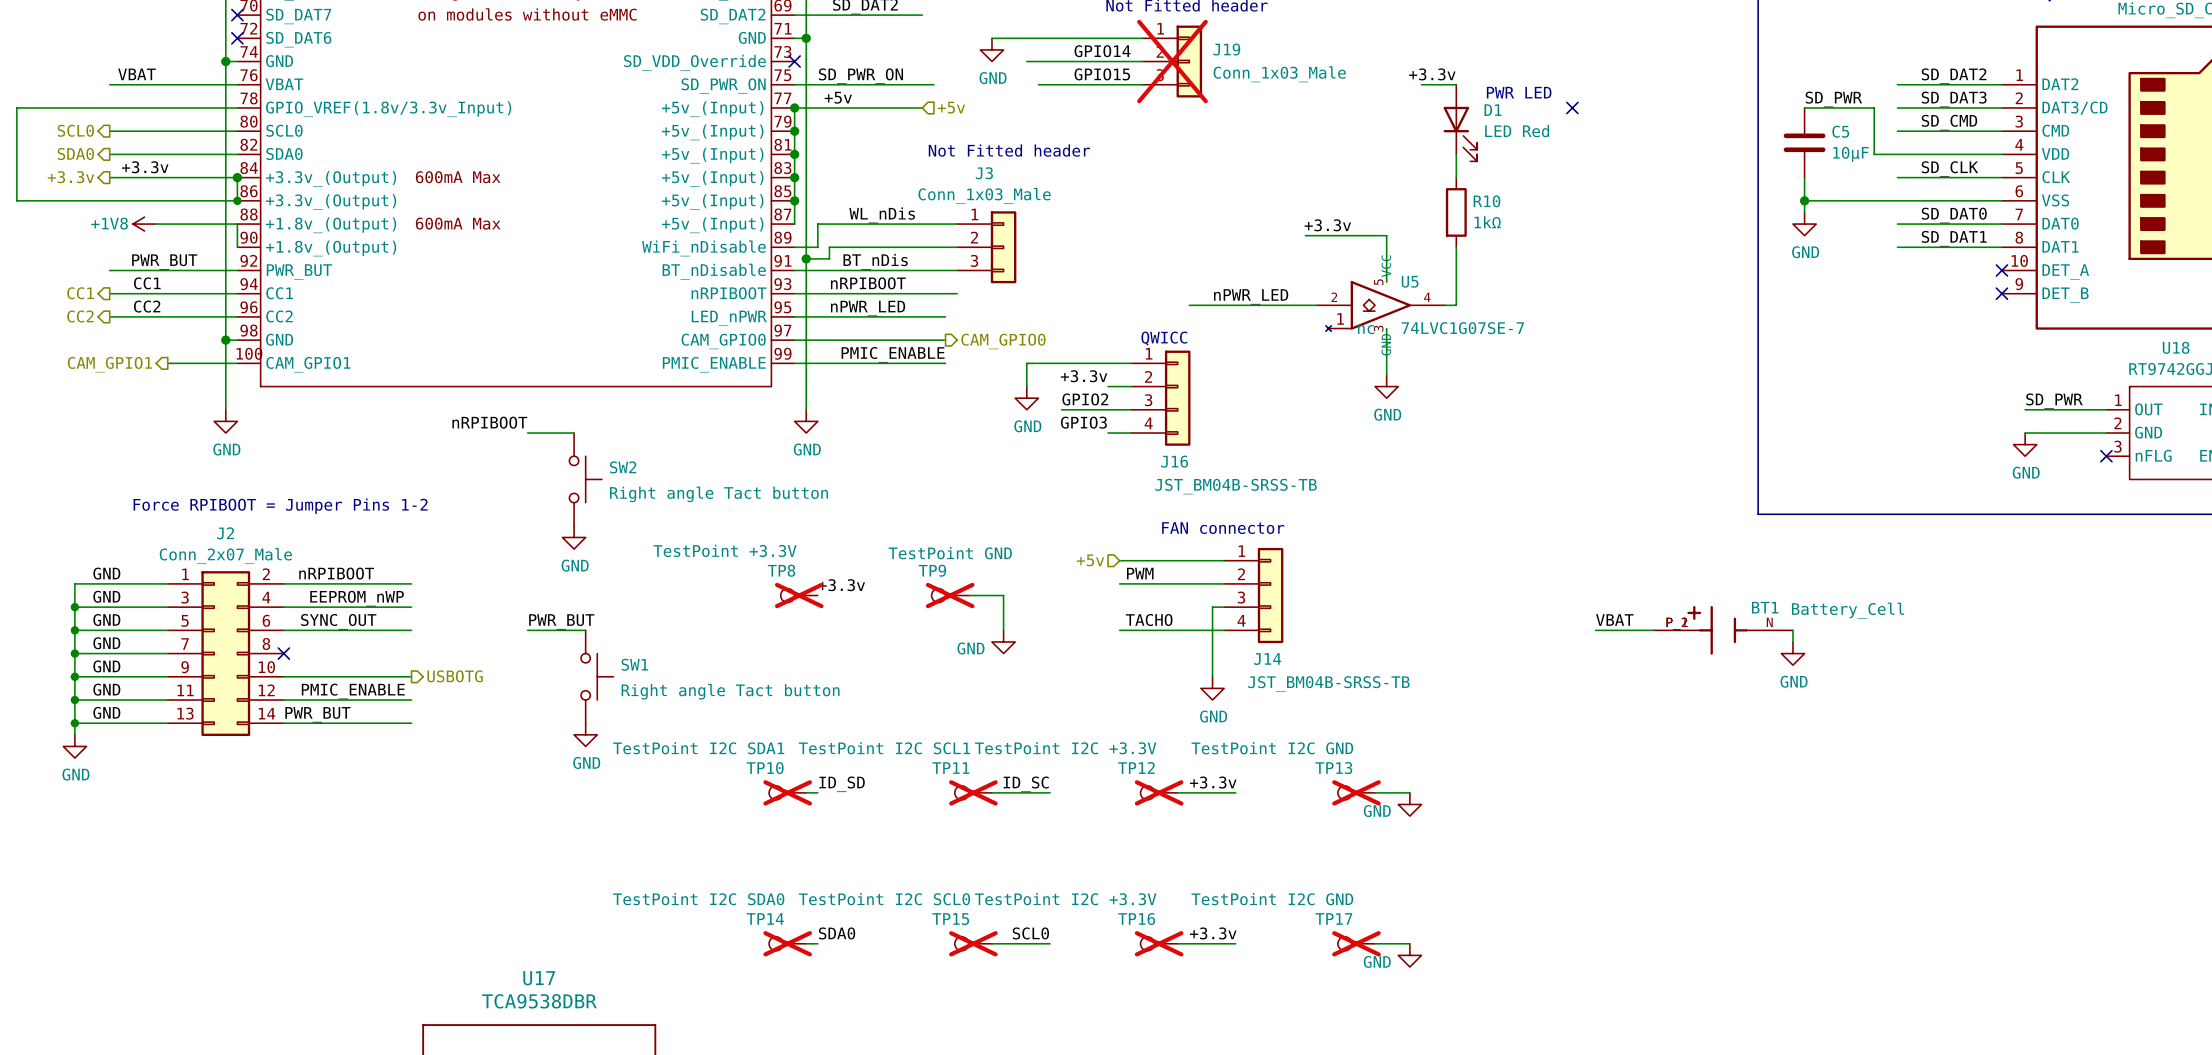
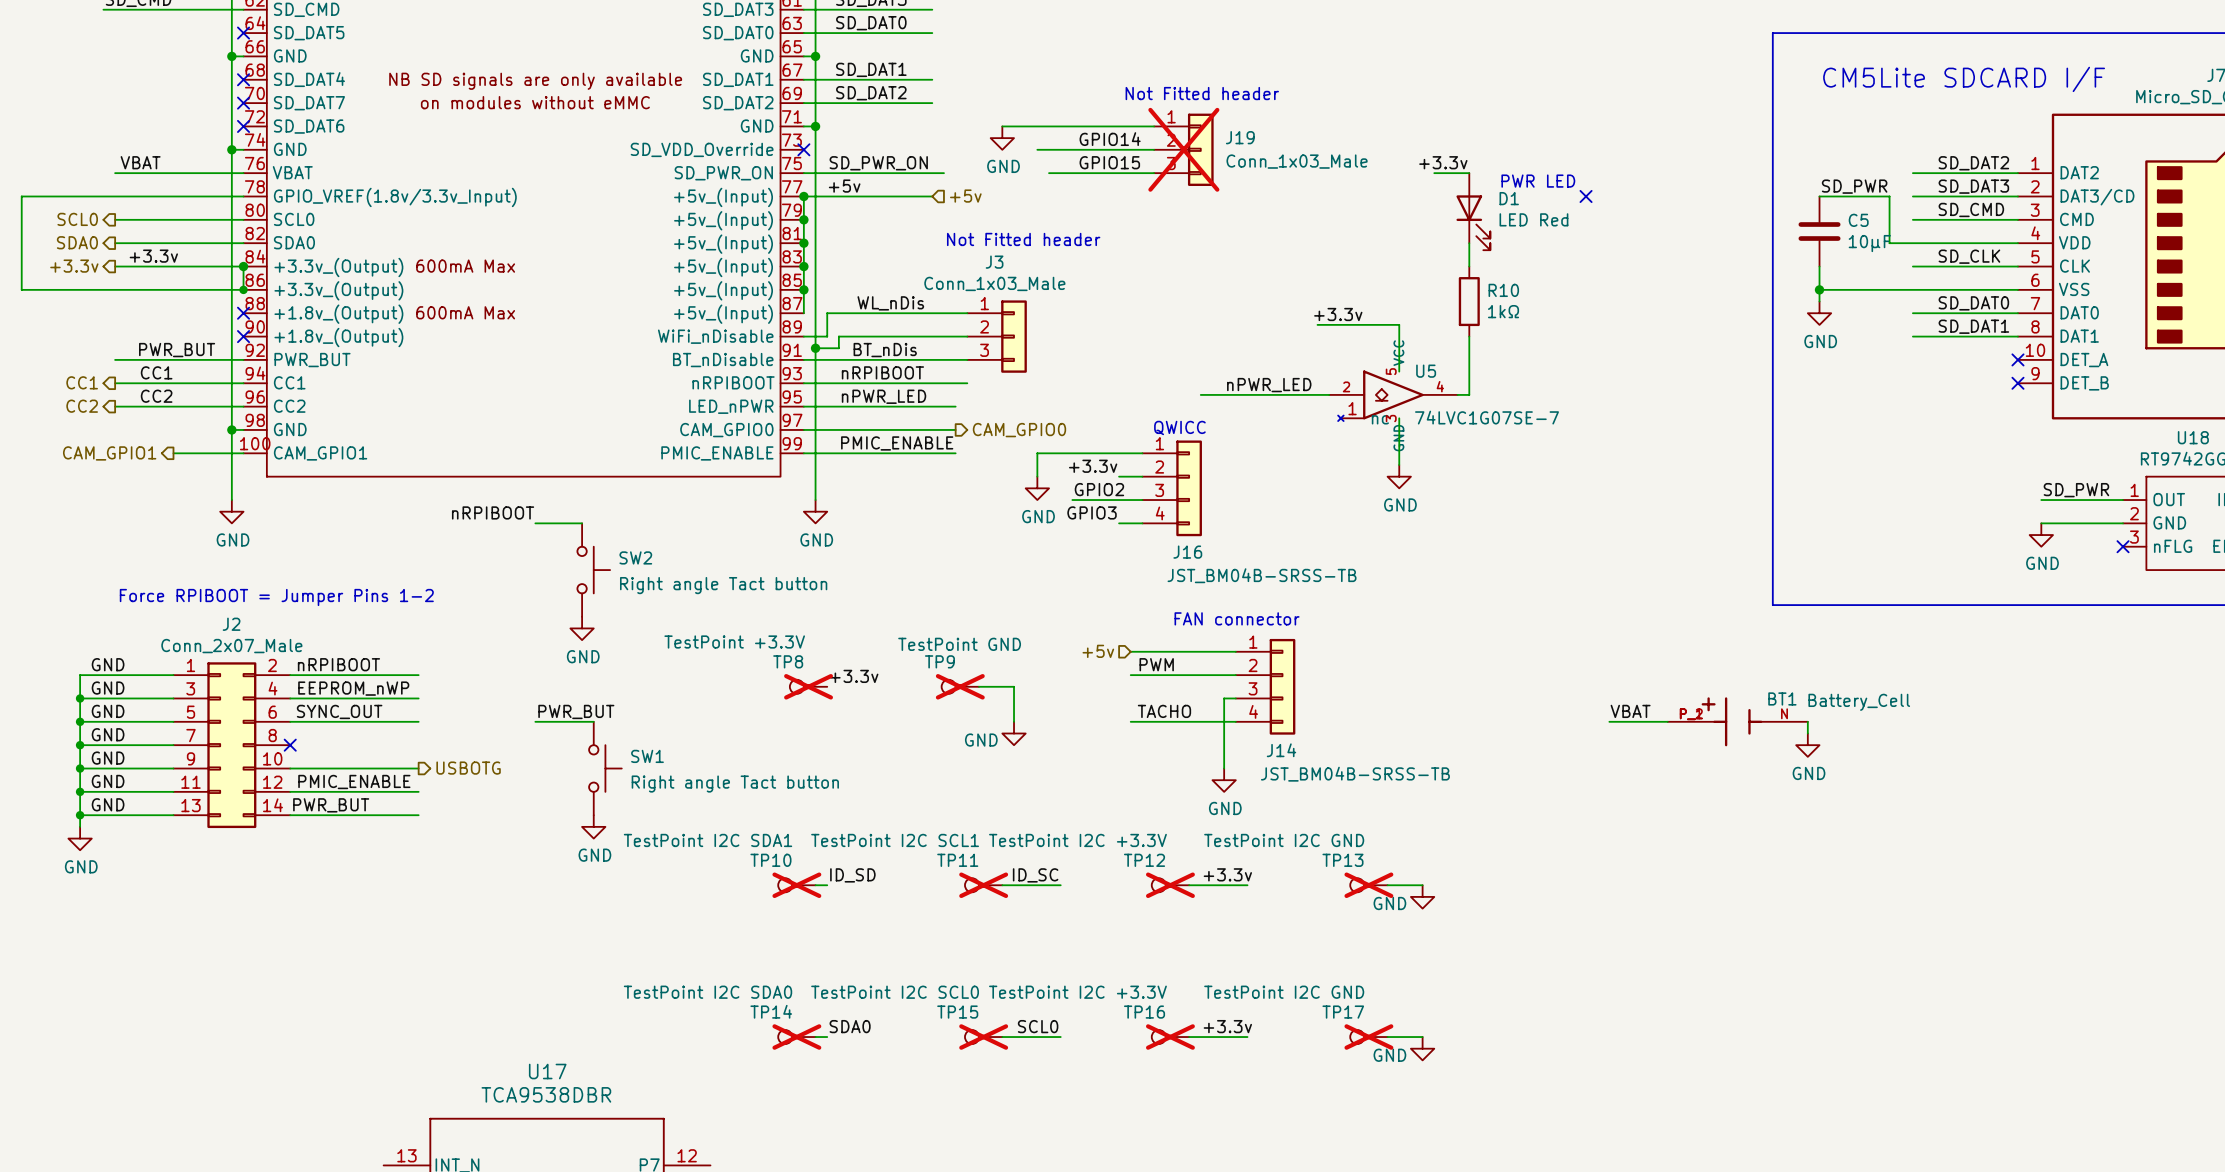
power symbol: +1V8 (144, 224) -> none
wire: (156, 224) (237, 224) (237, 247) -> none
no-connect mark: none -> (243, 313)
no-connect mark: none -> (243, 336)

